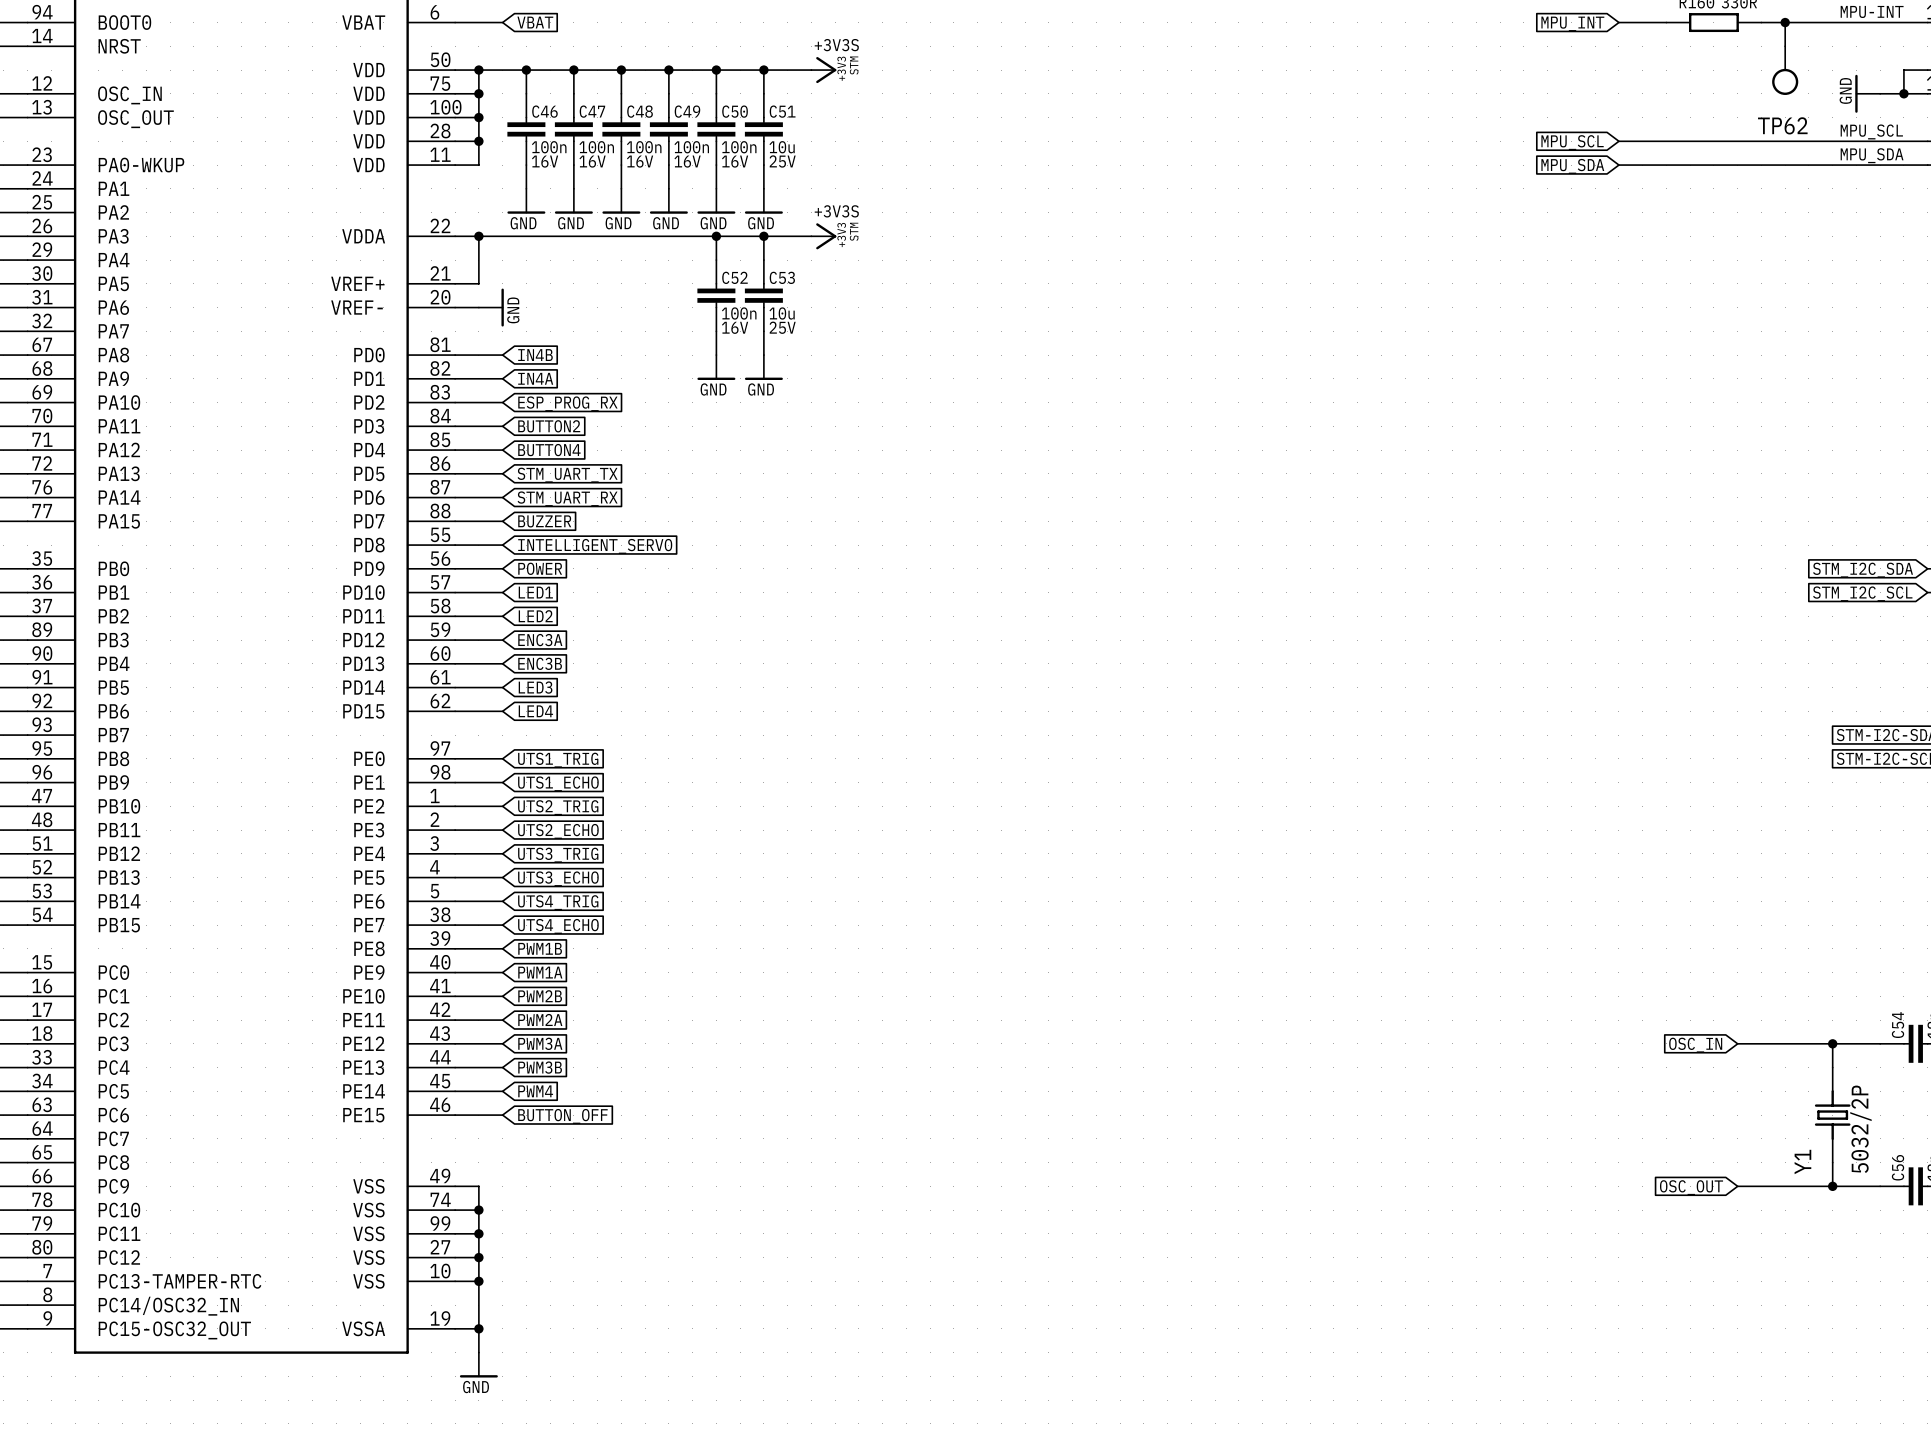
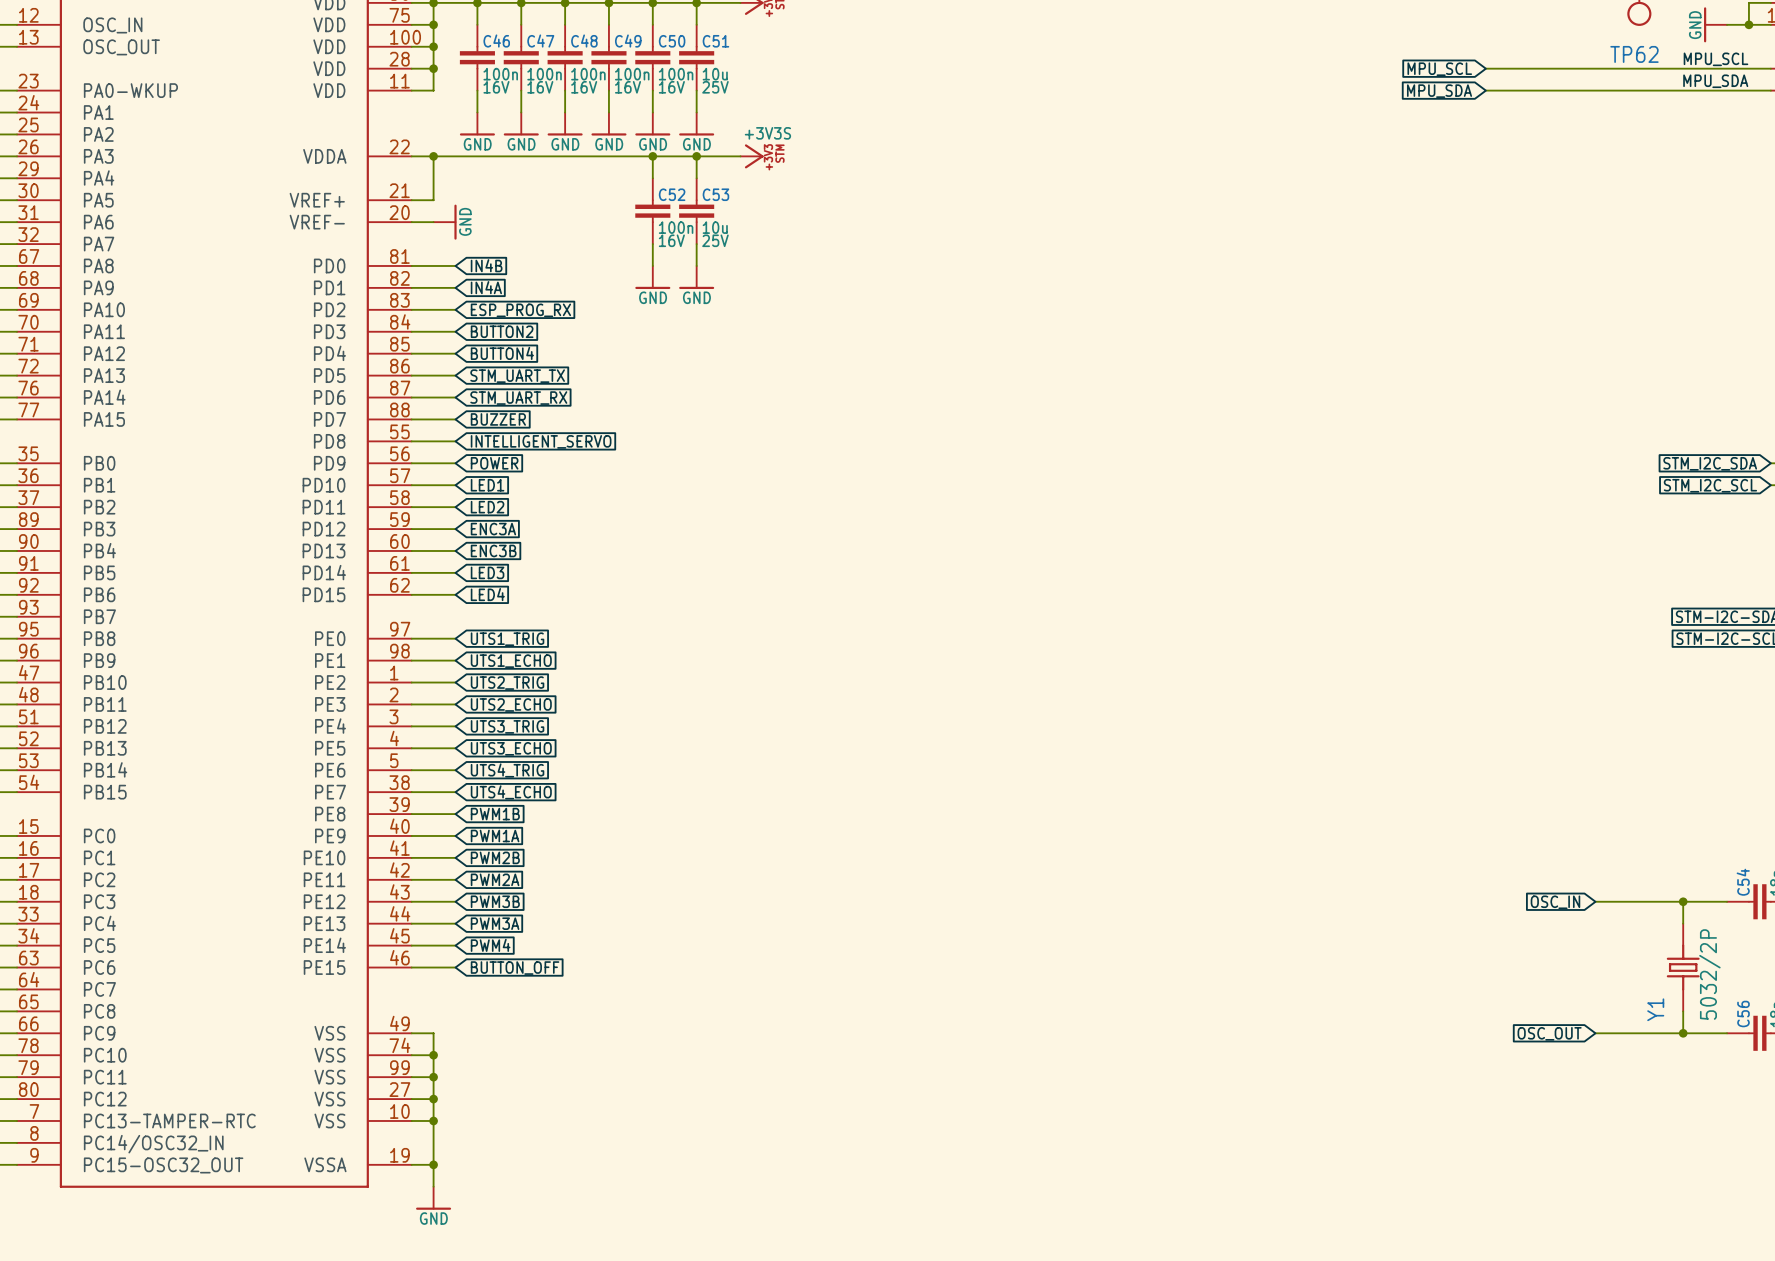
global label: PWM3A (540, 1043) -> PWM3B (495, 901)
global label: PWM3B (540, 1067) -> PWM3A (495, 923)

